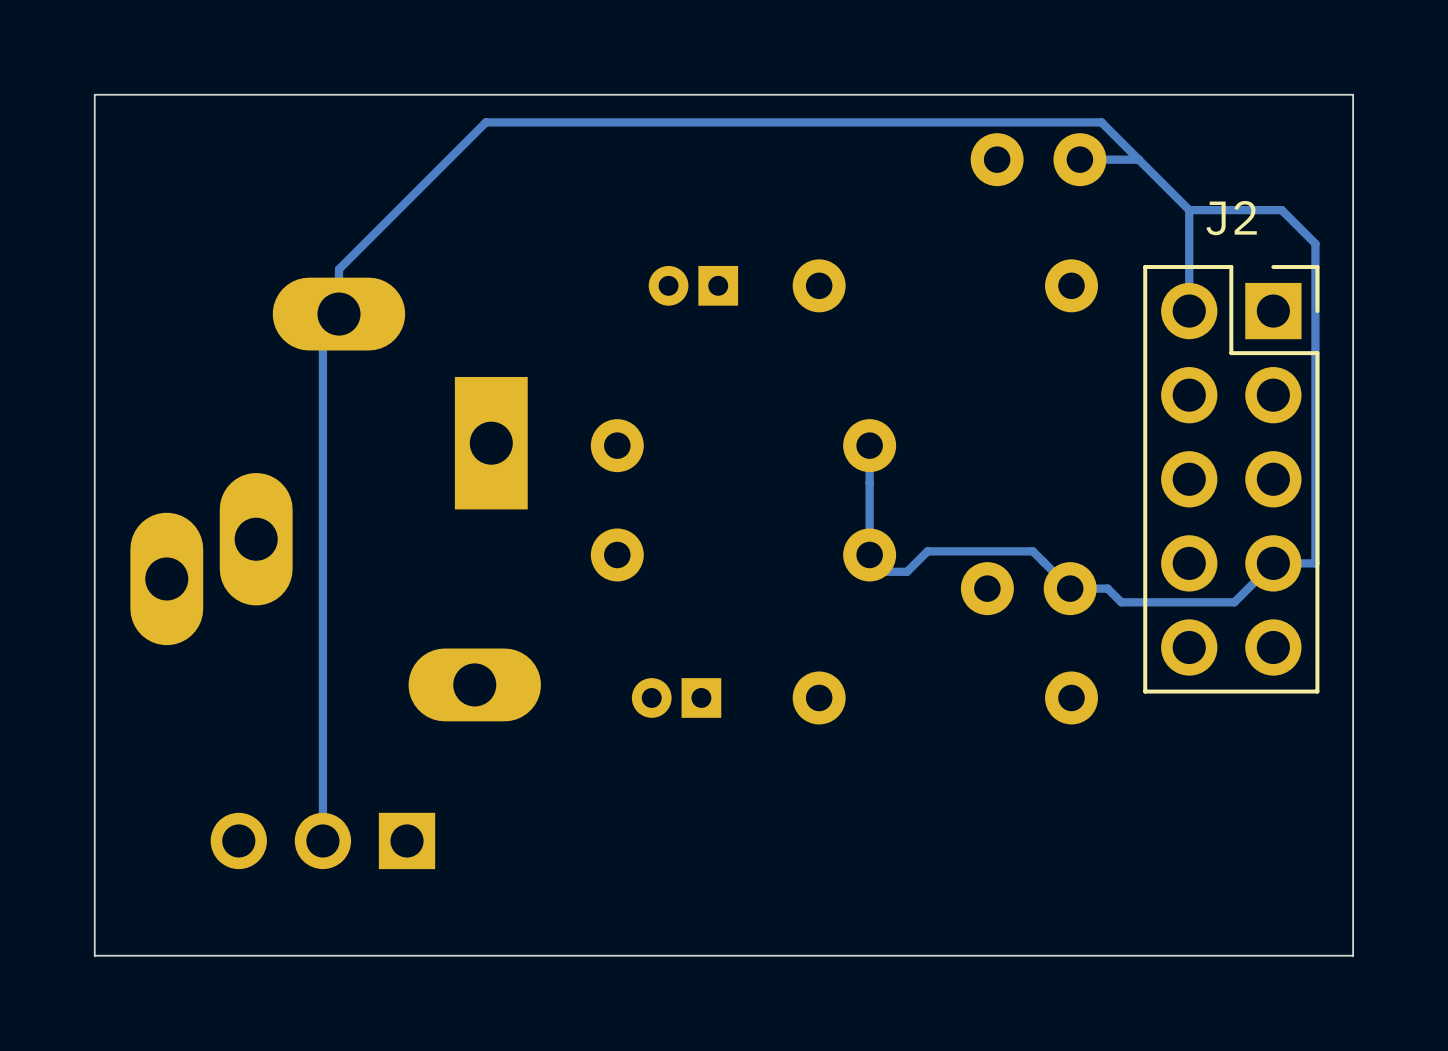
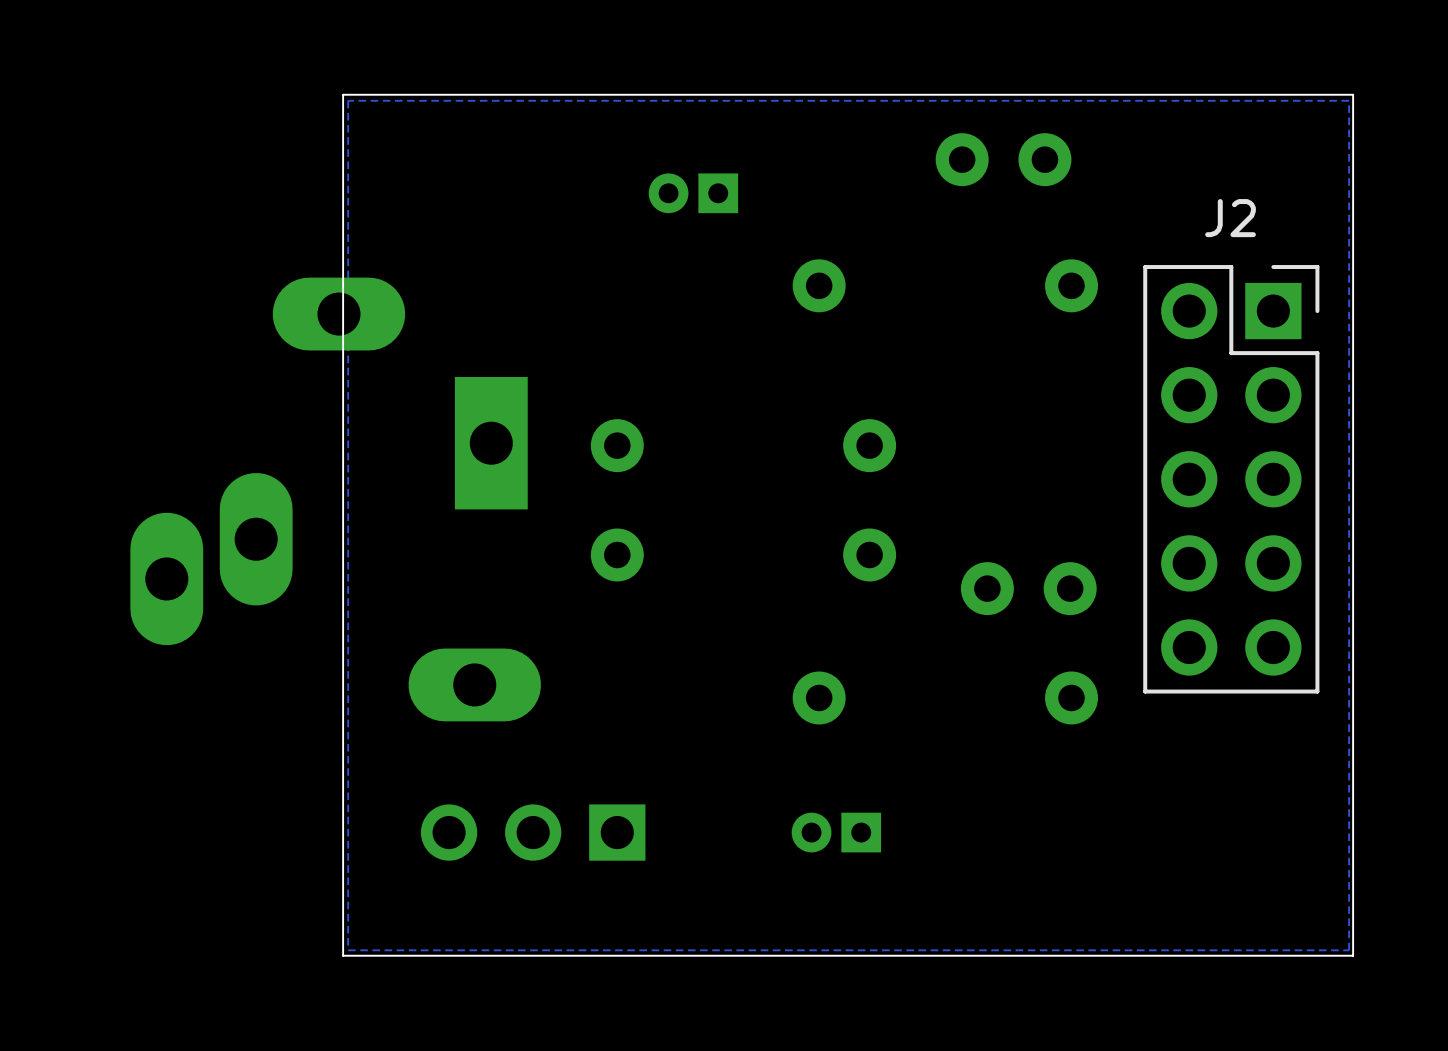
board edge: (343, 94) (94, 94) (94, 955) (343, 955) -> (343, 94) (343, 955)
zone outline: none -> (1349, 100) (1349, 950) (348, 950) (348, 100) (1349, 100)
part position: (1038, 159) -> (1003, 159)
track: (1138, 159) (1079, 159) -> none
track: (1189, 210) (1189, 311) -> none
track: (1189, 210) (1101, 122) (485, 122) (338, 269) (338, 314) (322, 330) (322, 840) -> none
track: (1189, 210) (1281, 210) (1315, 243) (1315, 563) (1273, 563) (1234, 602) (1121, 602) (1107, 588) (1070, 588) (1032, 551) (927, 551) (907, 571) (869, 571) (869, 445) -> none
part position: (693, 285) -> (693, 193)
part position: (676, 697) -> (836, 832)
part position: (322, 840) -> (533, 832)

